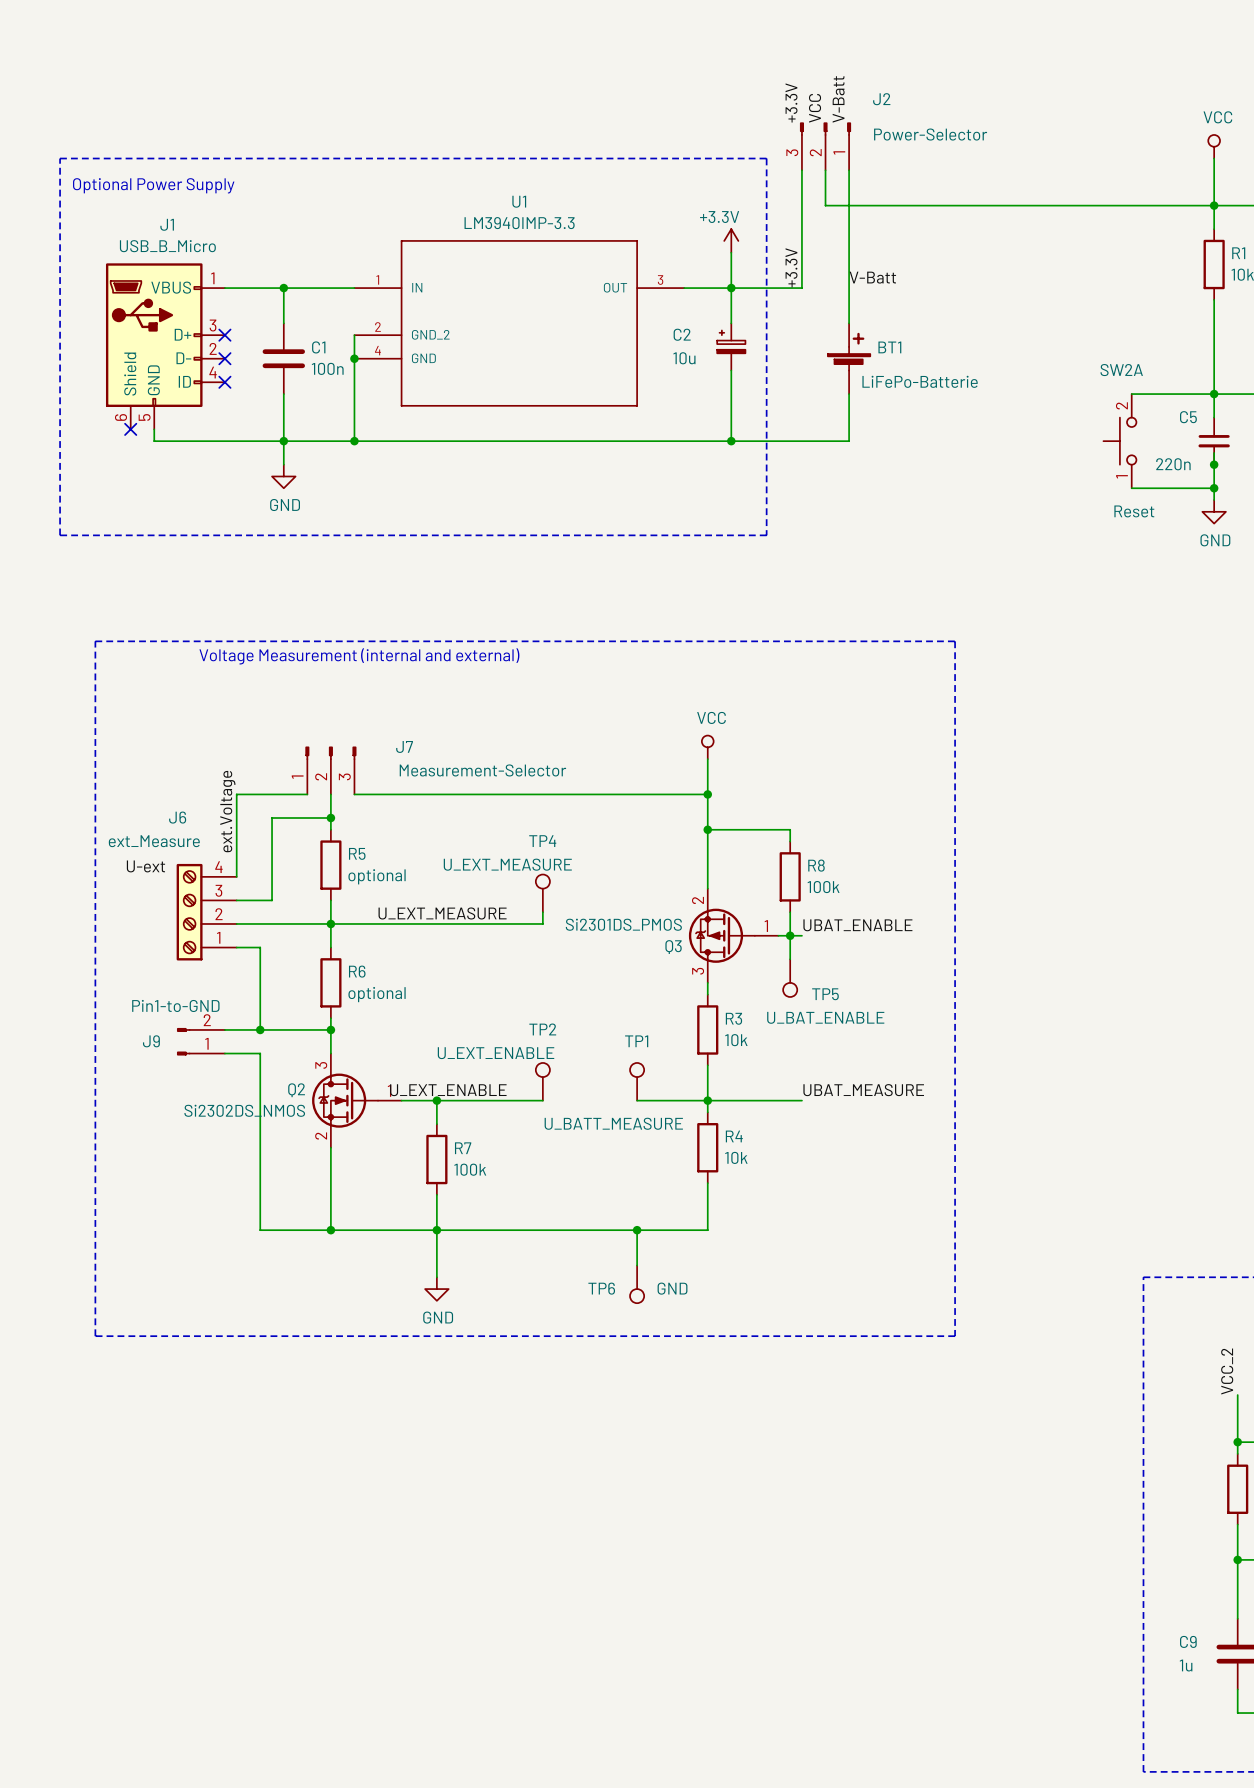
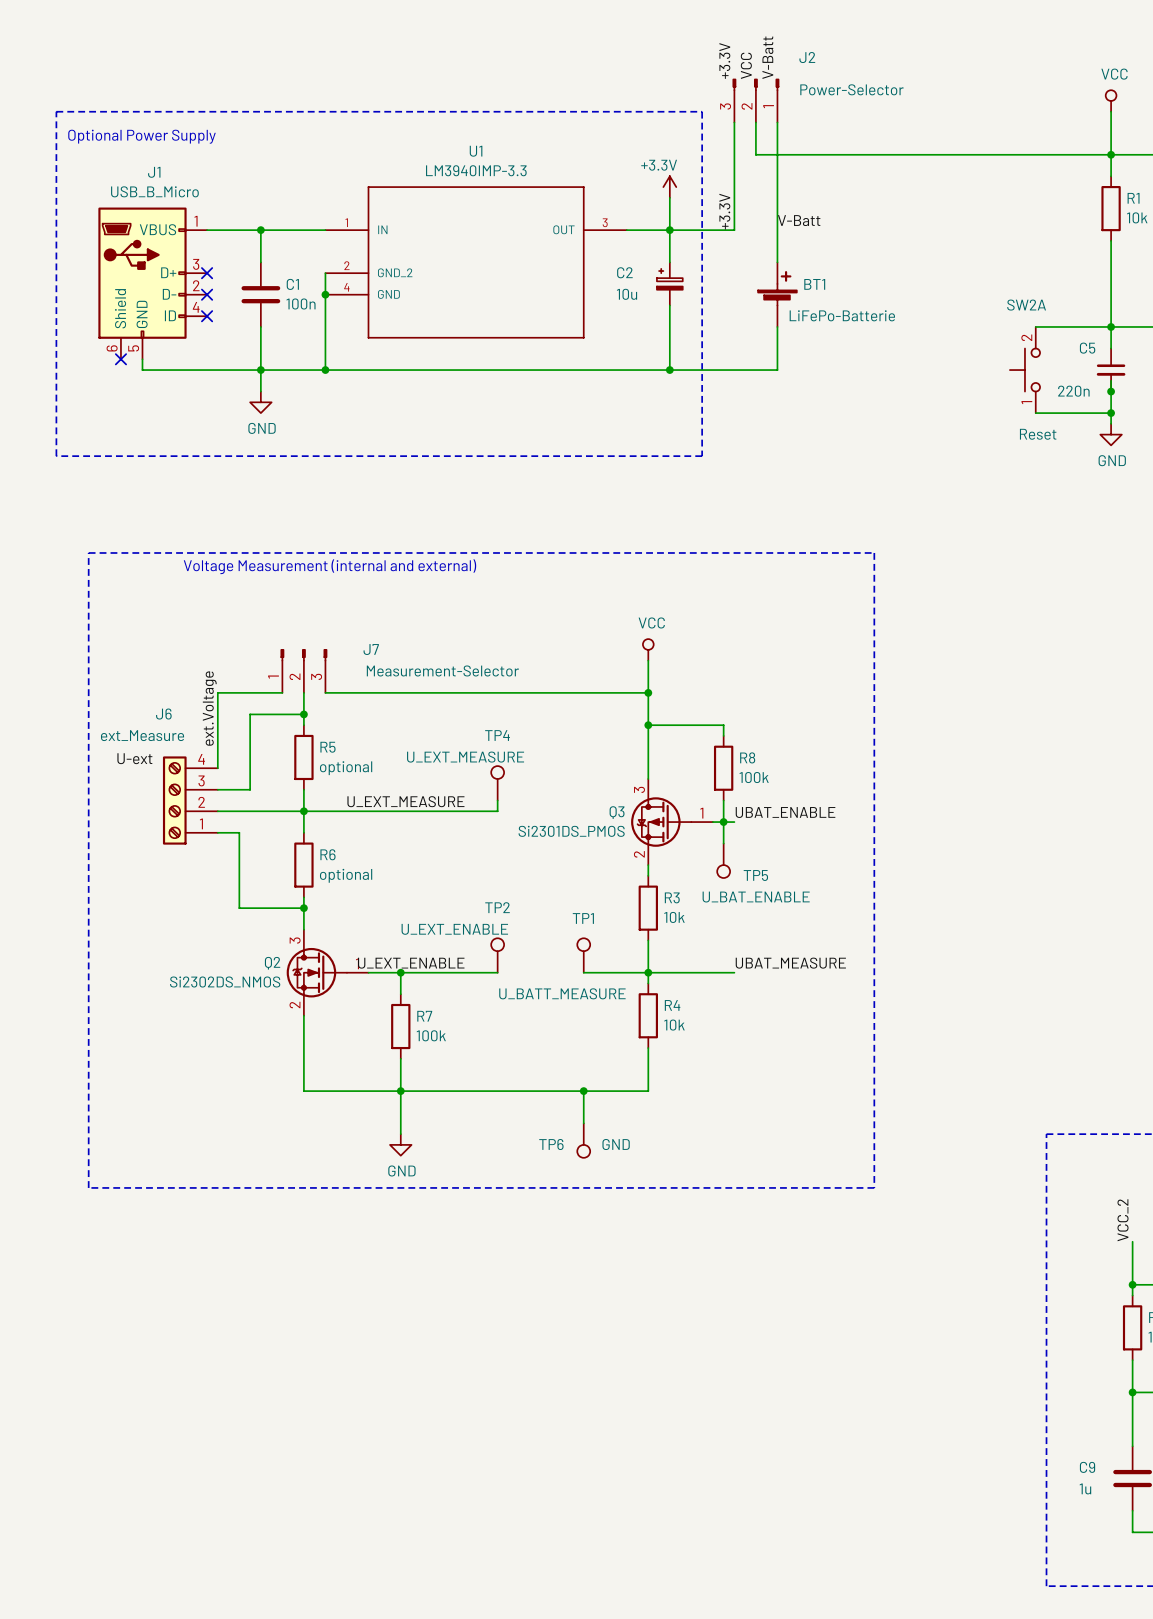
Q3 flip: as is (721, 935) -> up-down (661, 822)
wire: (224, 1029) (260, 1029) -> none
junction: (260, 1029) -> none
J9: Pin1-to-GND (201, 1041) -> none
wire: (224, 1053) (260, 1053) (260, 1230) (330, 1230) -> none
junction: (330, 1230) -> none

